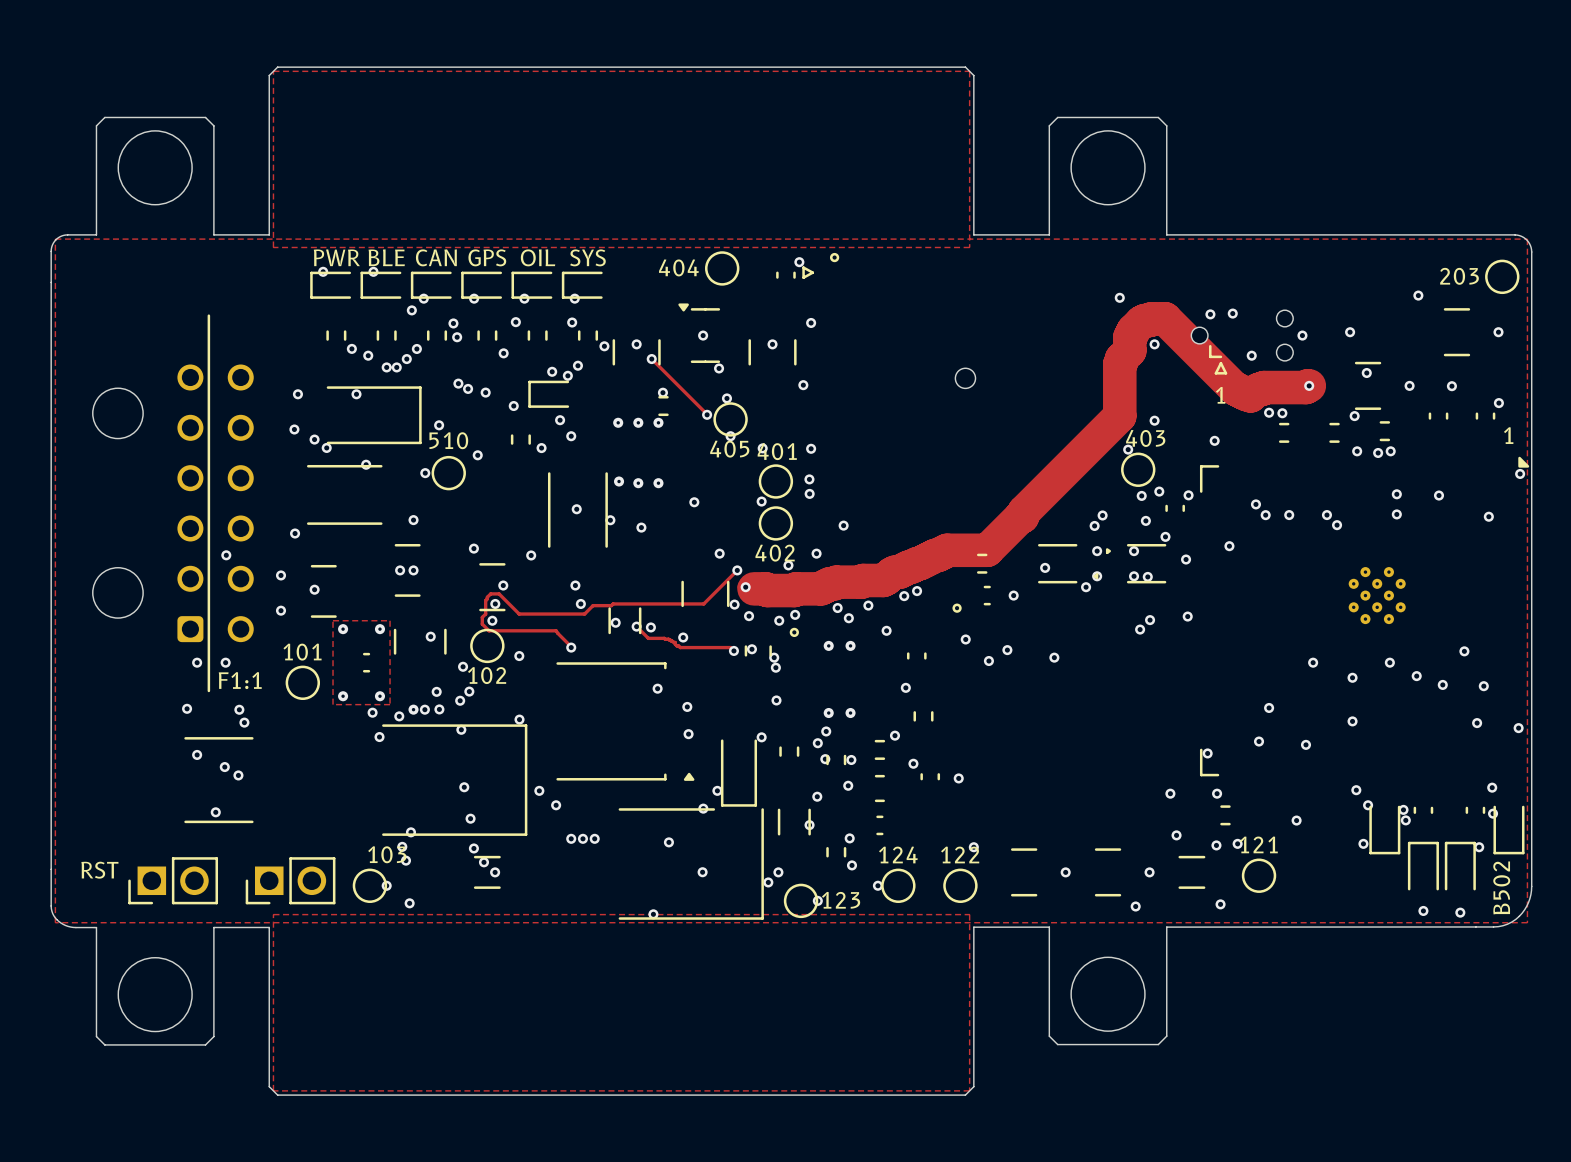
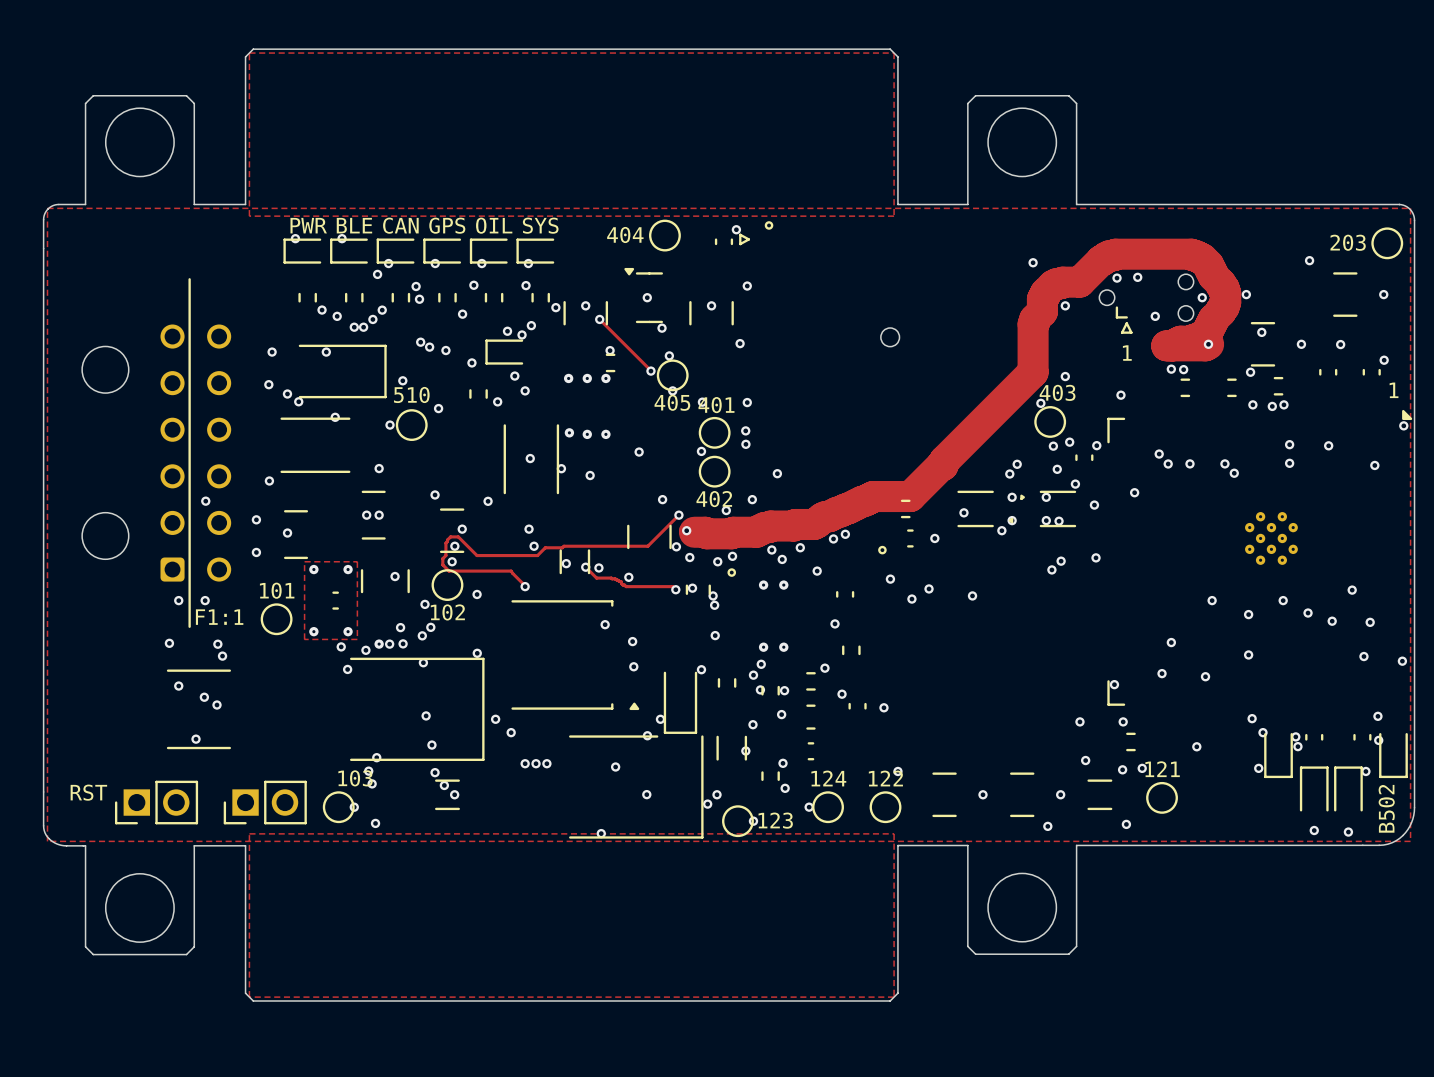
track: (1165, 318) (1235, 389) (1250, 395) (1255, 390) (1264, 387) -> (1075, 282) (1079, 282) (1101, 260) (1115, 254) (1191, 254) (1202, 258) (1224, 288) (1225, 293) (1224, 307) (1202, 336) (1191, 341) (1180, 341) (1172, 345)

